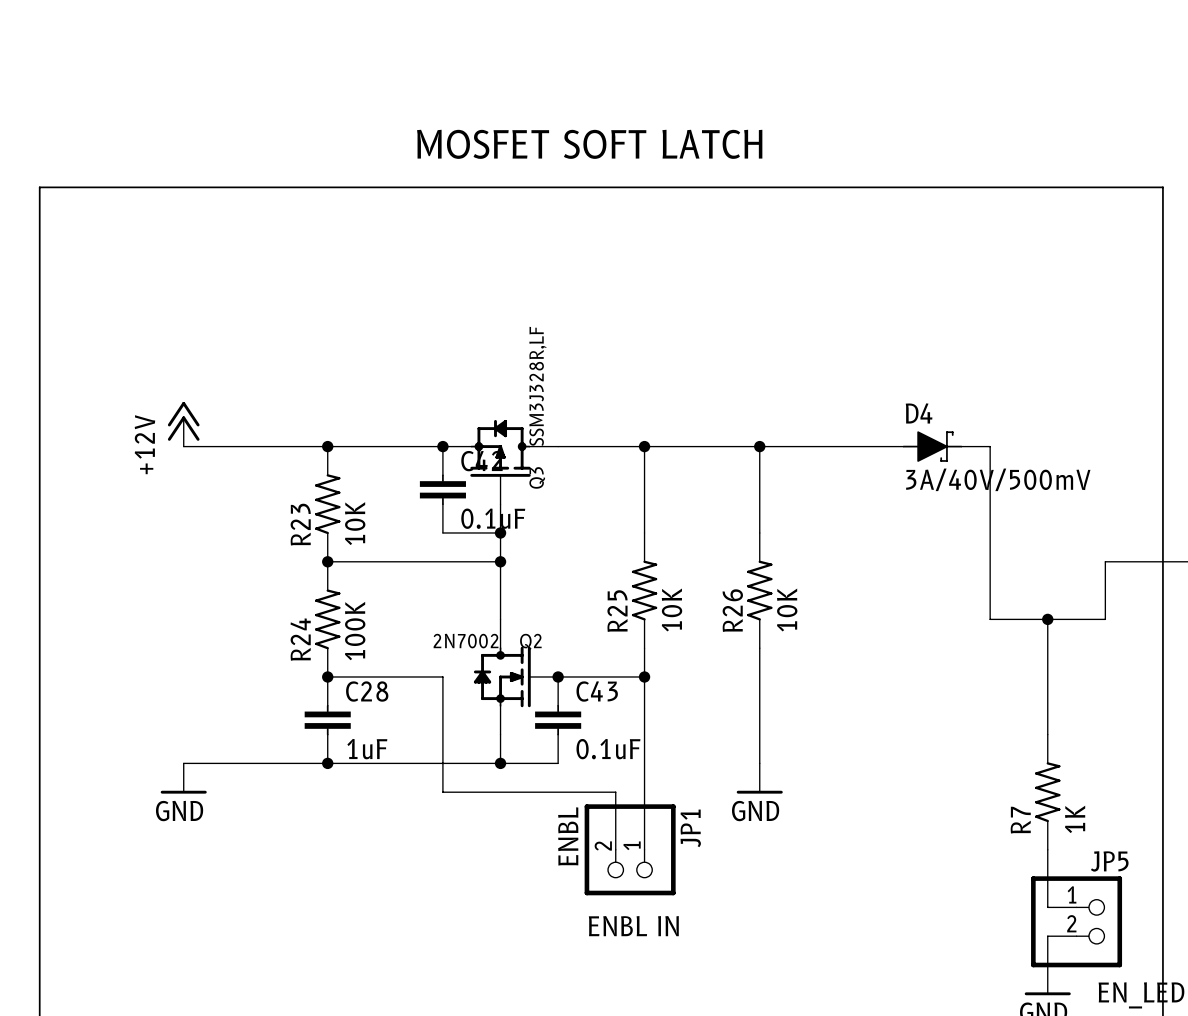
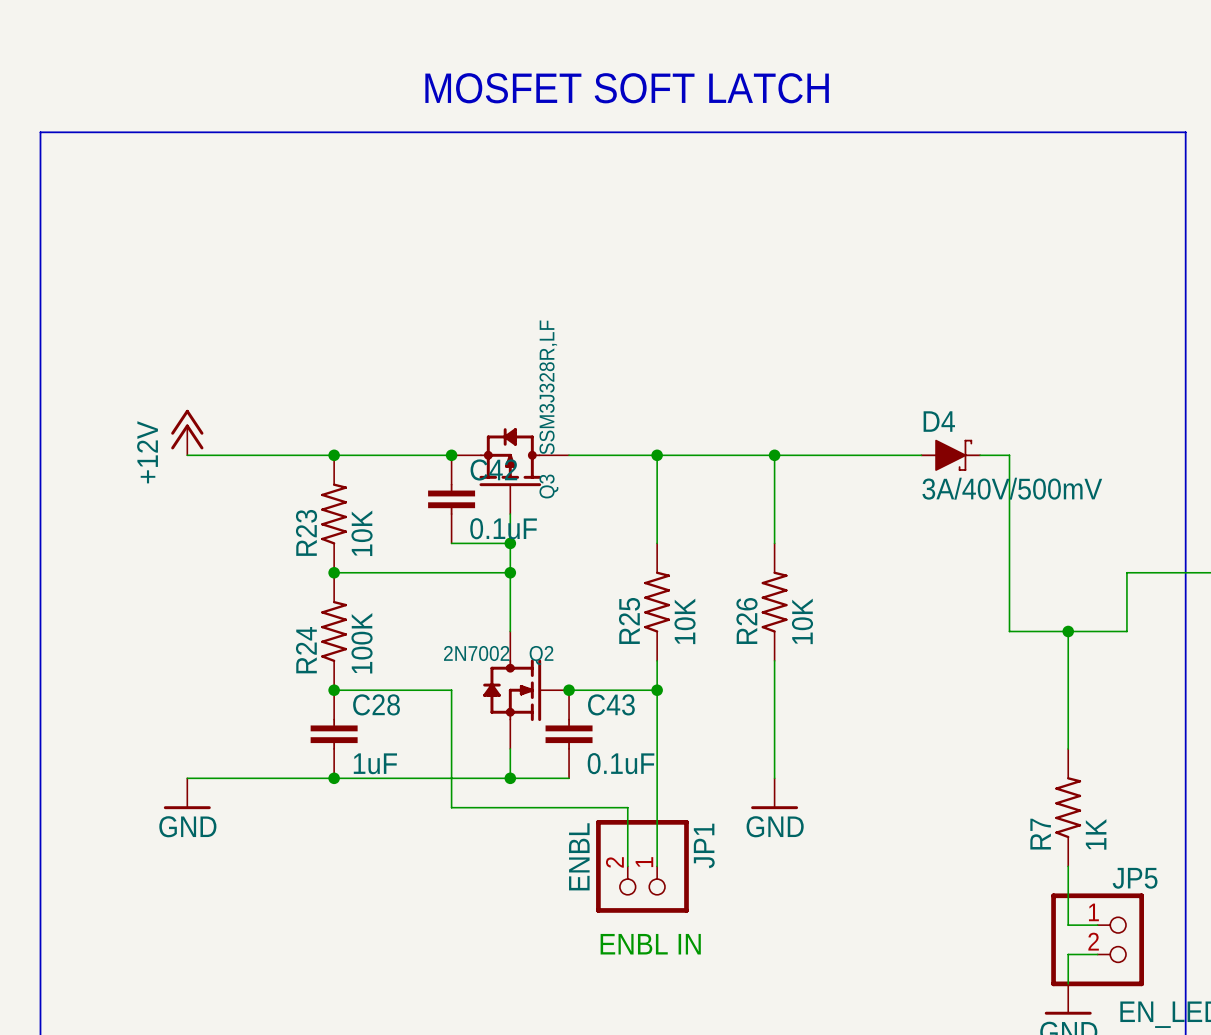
text position: MOSFET SOFT LATCH (589, 144) -> MOSFET SOFT LATCH (627, 88)
line: (39, 187) (1162, 187) -> (40, 191) (40, 132) (1185, 132) (1185, 191)

